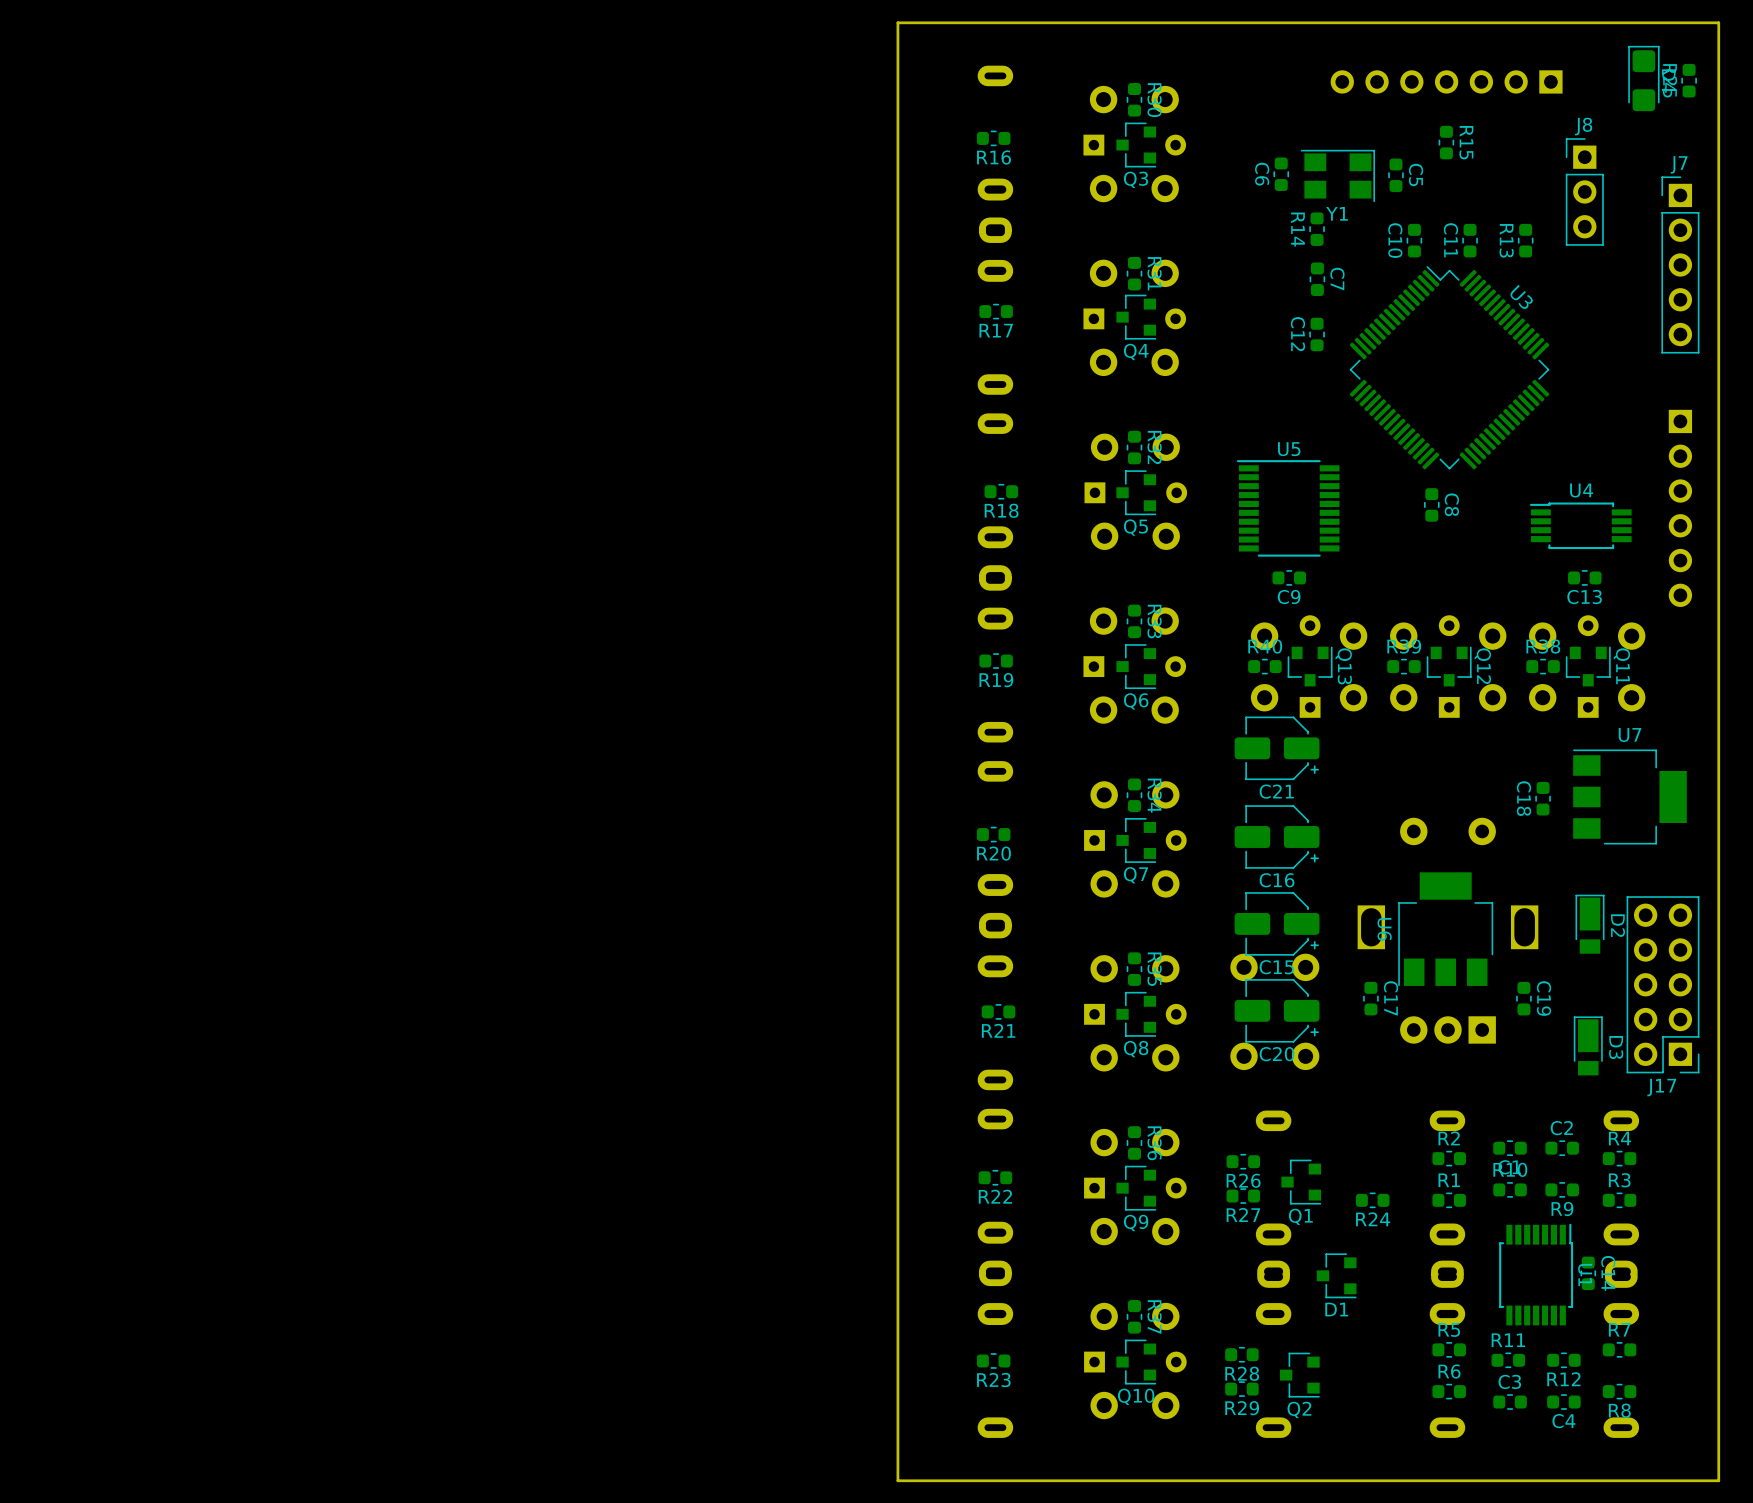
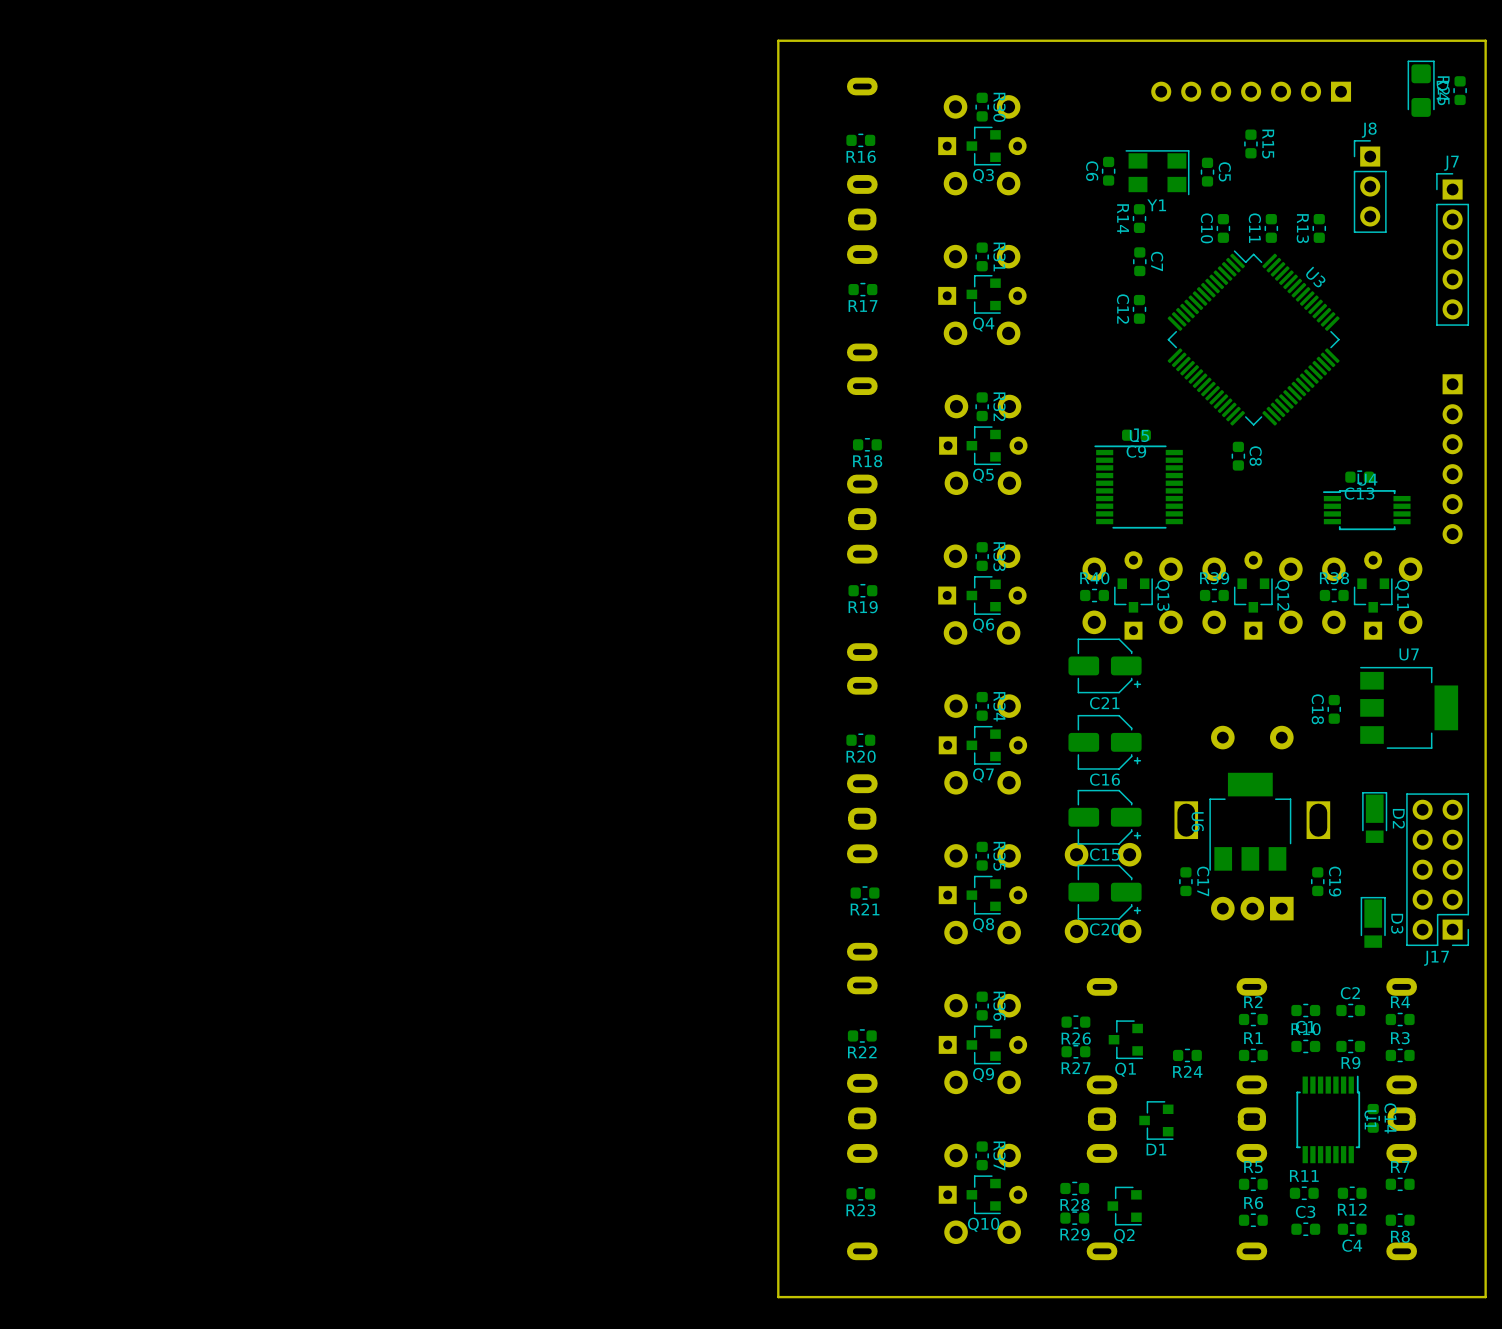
U5 position: (1288, 508) -> (1138, 487)
U4 position: (1580, 525) -> (1366, 510)
C9 position: (1289, 577) -> (1136, 435)
C13 position: (1584, 577) -> (1359, 477)

